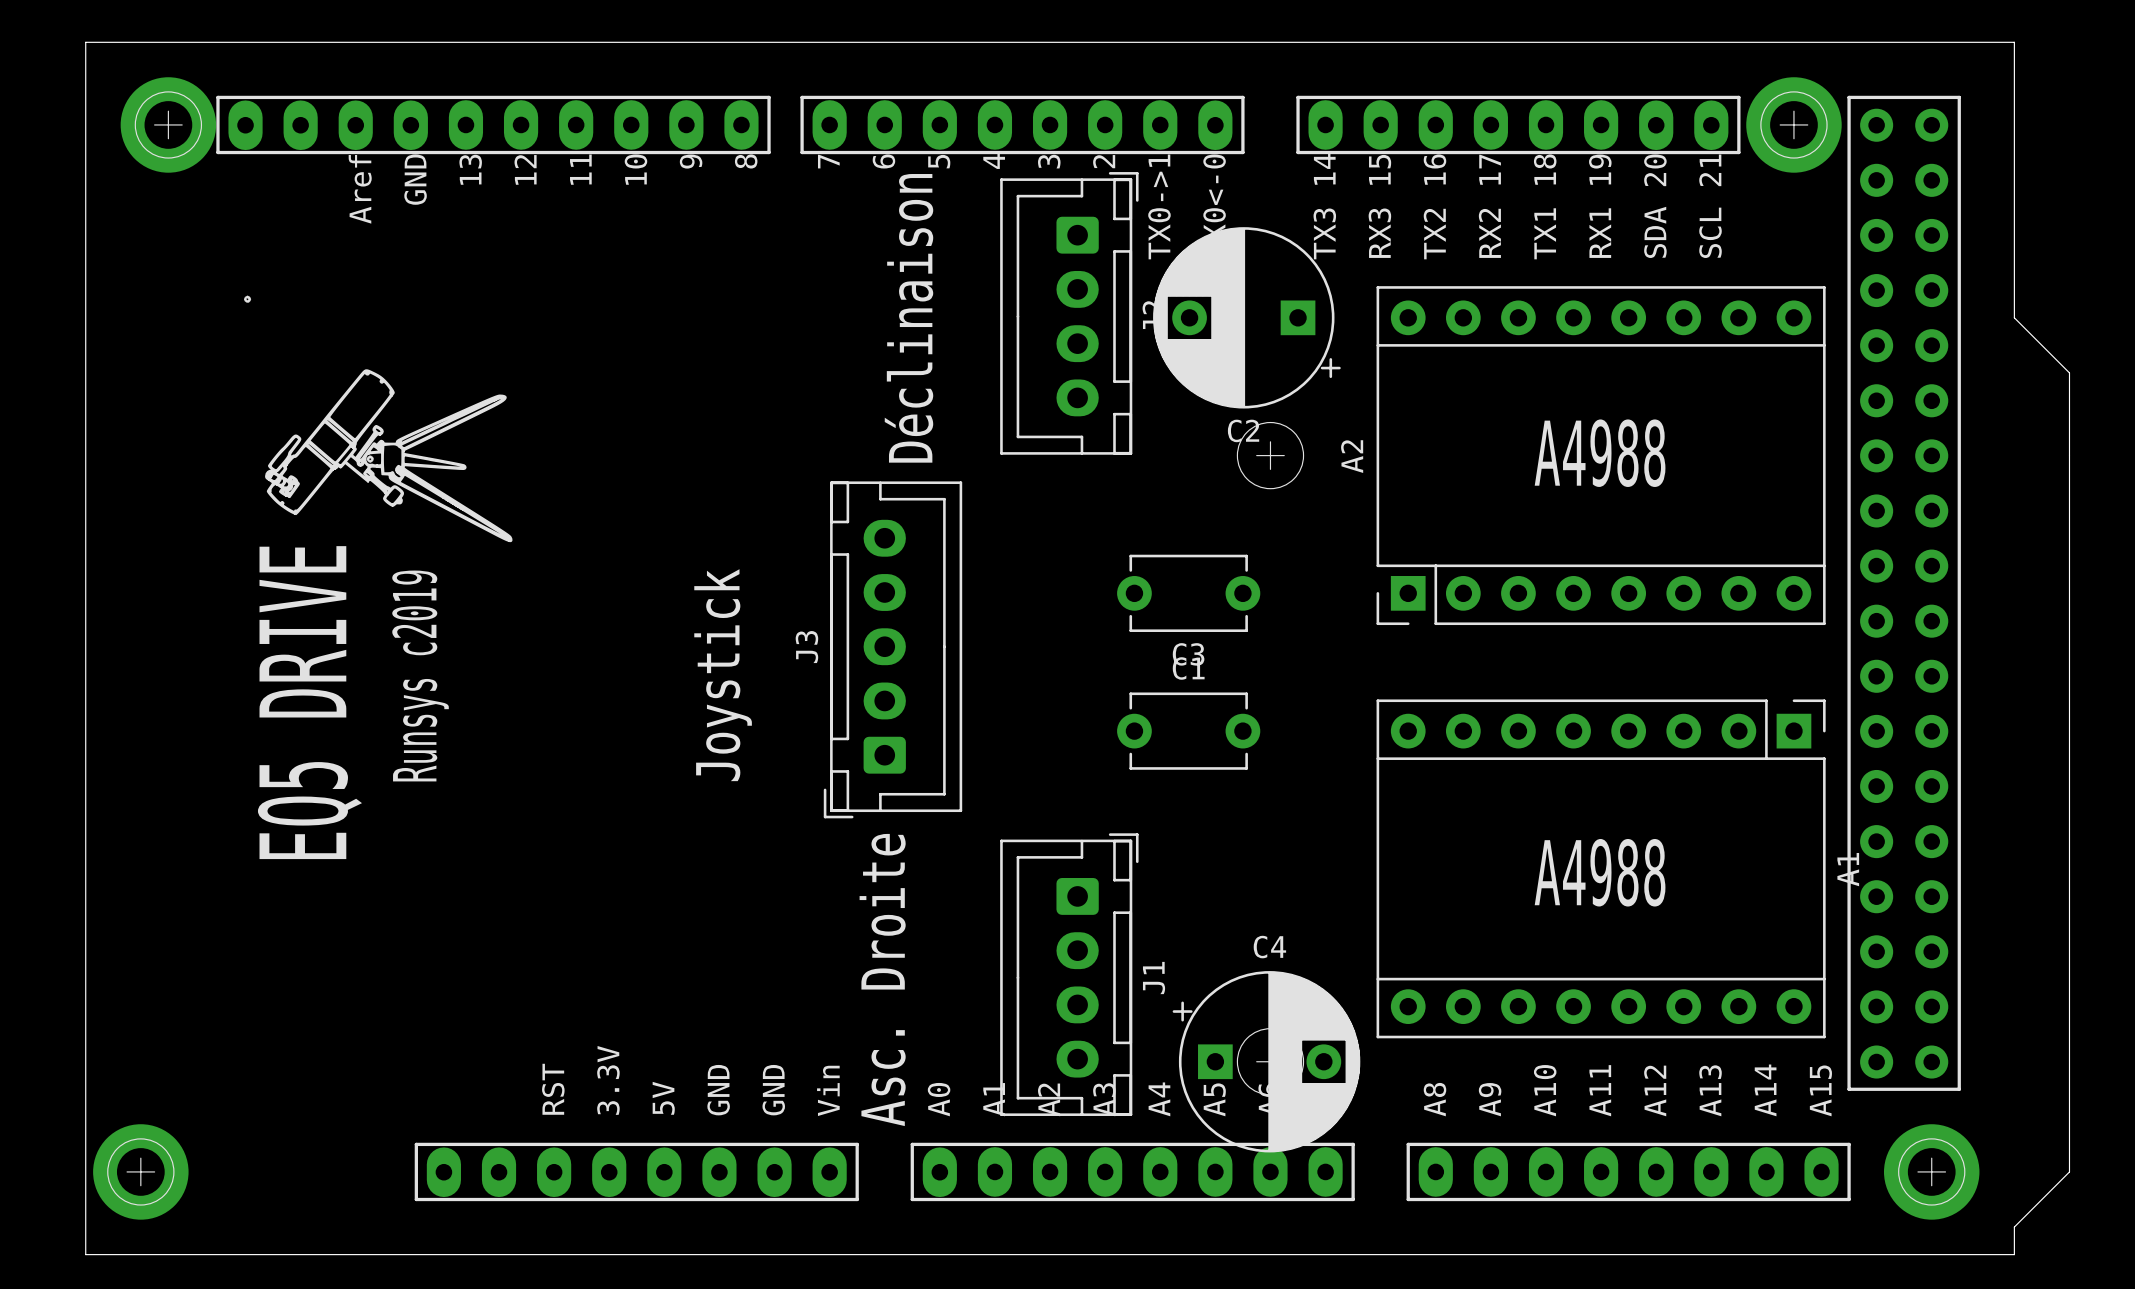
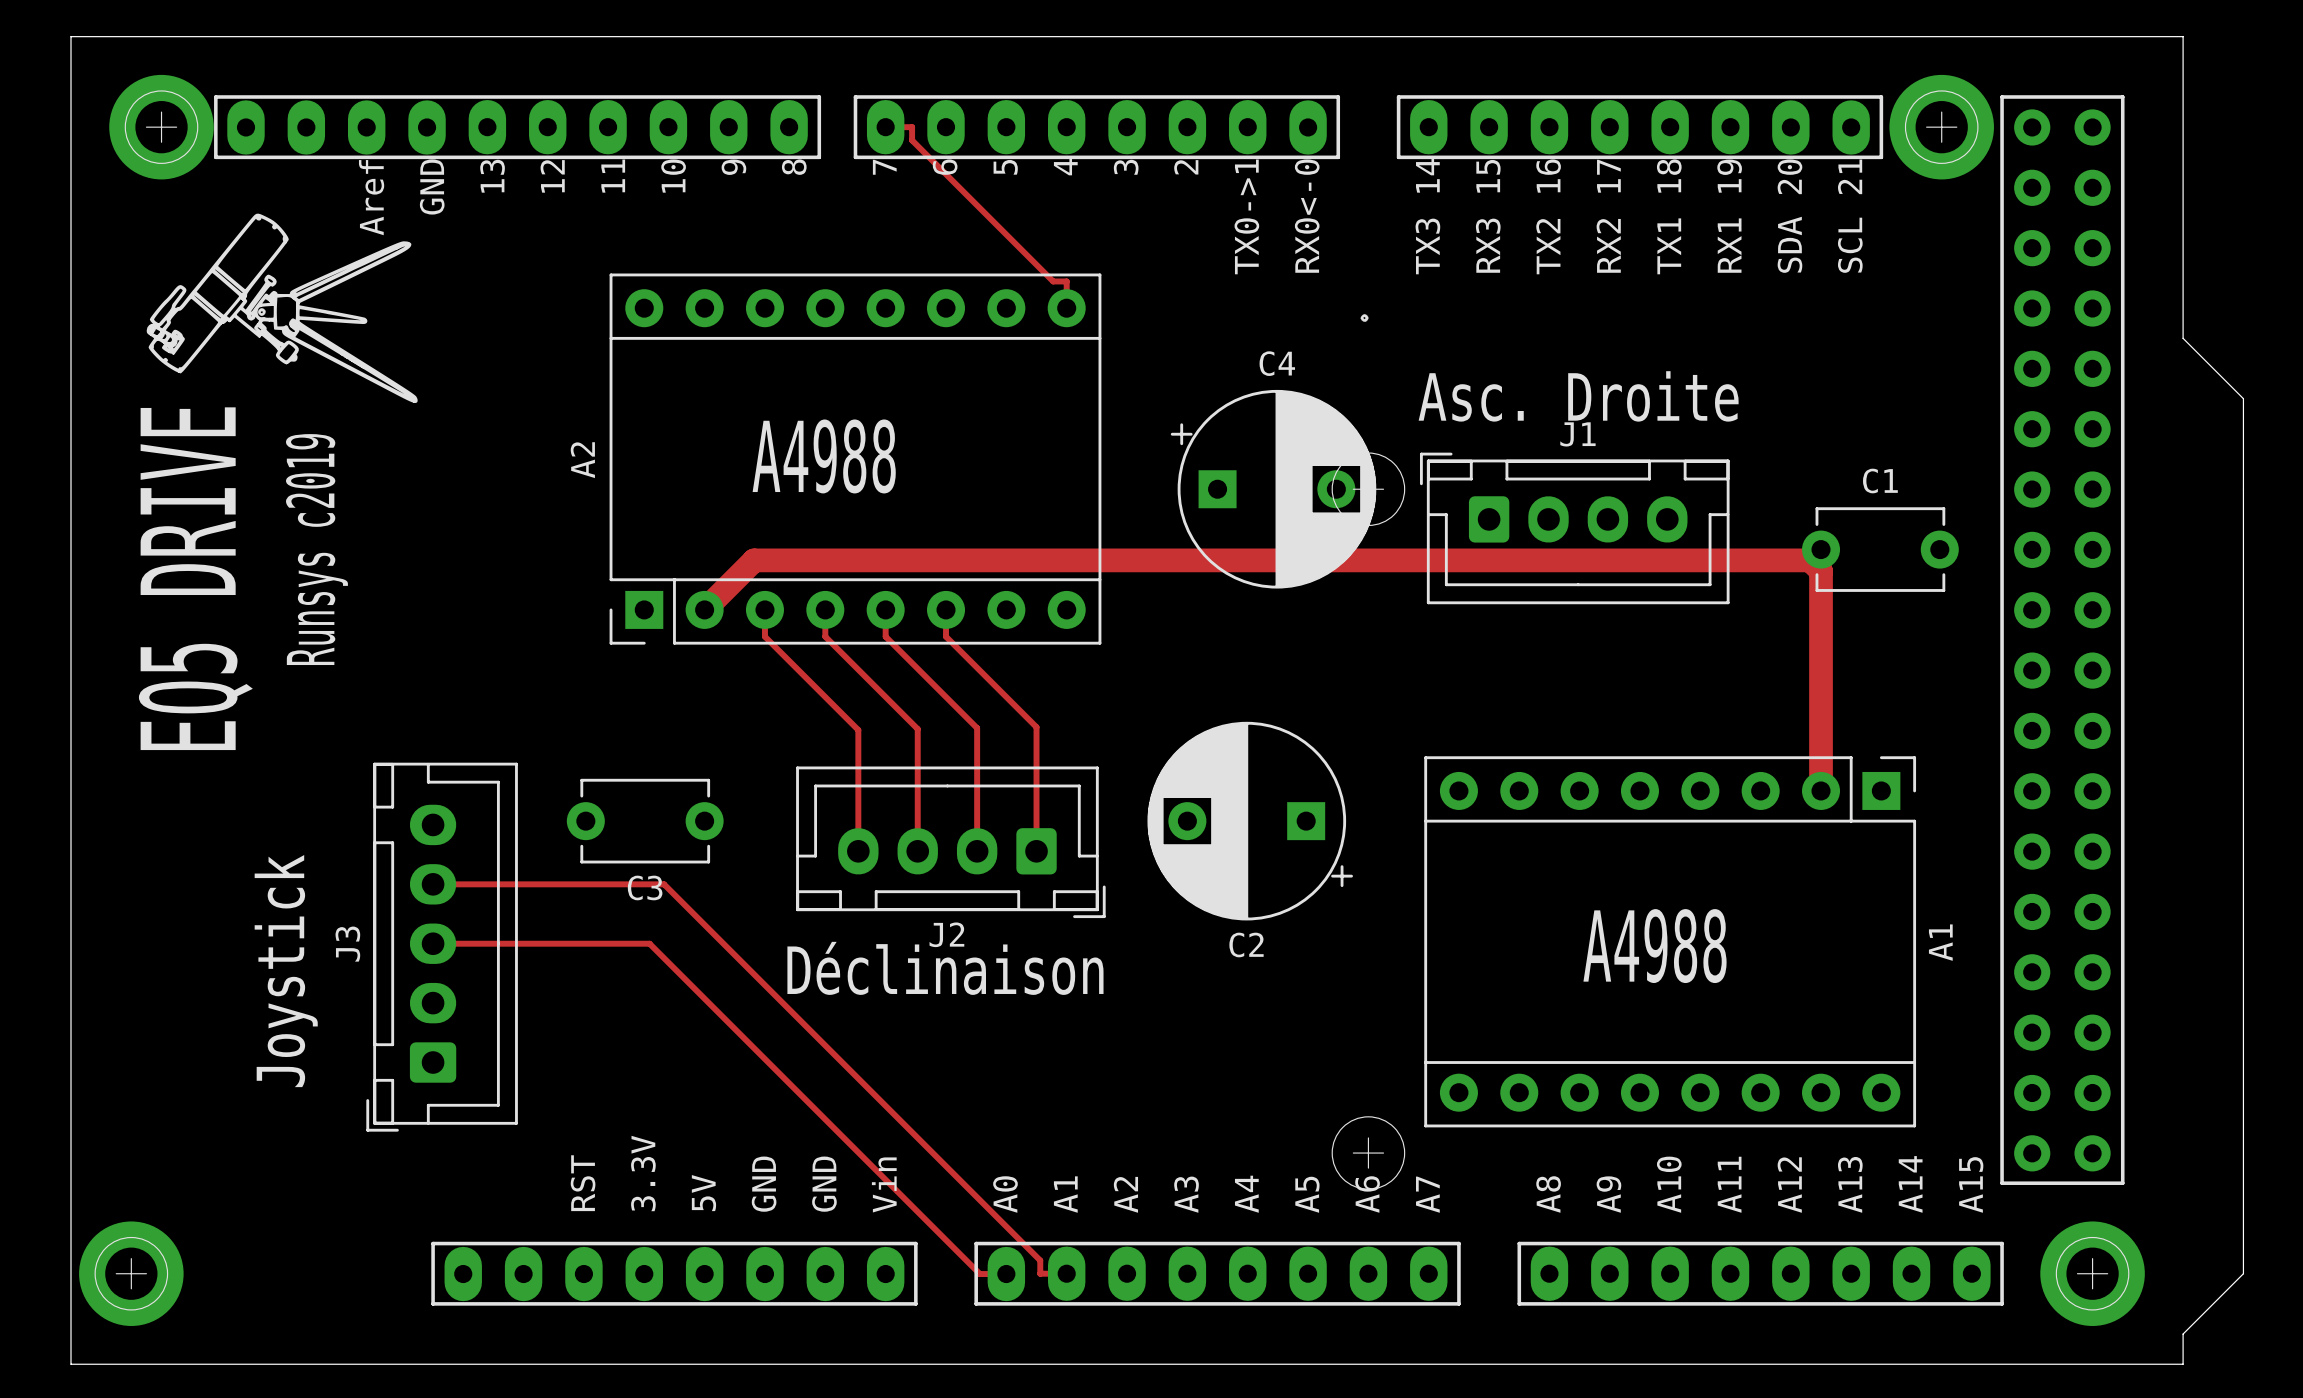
track: none -> (885, 127) (912, 127) (912, 140) (1053, 281) (1066, 281) (1066, 308)
drawing: [243, 295, 252, 303] -> none
drawing: none -> [1360, 314, 1369, 322]
J2 rotation: 0° (1069, 313) -> 90° clockwise (950, 842)
J2 position: (1069, 313) -> (950, 842)
C2 position: (1246, 317) -> (1250, 821)
text: Déclinaison (908, 318) -> none
text: none -> Asc. Droite (1578, 396)
text: none -> A4988 (824, 456)
text: A4988 (1600, 453) -> none
drawing position: (388, 455) -> (282, 308)
A2 position: (1601, 455) -> (855, 459)
track: none -> (1810, 560) (754, 560) (704, 609)
track: none -> (1810, 560) (1821, 571) (1821, 790)
track: none -> (764, 609) (764, 636) (858, 730) (858, 851)
track: none -> (825, 609) (825, 636) (917, 729) (917, 851)
track: none -> (885, 609) (885, 636) (977, 728) (977, 851)
track: none -> (946, 609) (946, 636) (1036, 727) (1036, 851)
C3 position: (1188, 593) -> (645, 821)
J3 position: (892, 649) -> (442, 947)
text position: Runsys c2019 (420, 675) -> Runsys c2019 (316, 549)
text position: Joystick (723, 675) -> Joystick (286, 971)
text position: EQ5 DRIVE (309, 702) -> EQ5 DRIVE (195, 578)
C1 position: (1188, 731) -> (1880, 549)
track: none -> (433, 884) (664, 884) (1040, 1260) (1040, 1273) (1066, 1273)
A1 position: (1601, 868) -> (1670, 941)
track: none -> (433, 943) (649, 943) (979, 1274) (1006, 1274)
text position: A4988 (1600, 872) -> A4988 (1655, 946)
text: none -> Déclinaison (945, 968)
J1 rotation: 0° (1069, 974) -> 90° counterclockwise (1574, 528)
J1 position: (1069, 974) -> (1574, 528)
text: Asc. Droite (882, 980) -> none
C4 position: (1266, 1061) -> (1273, 489)

